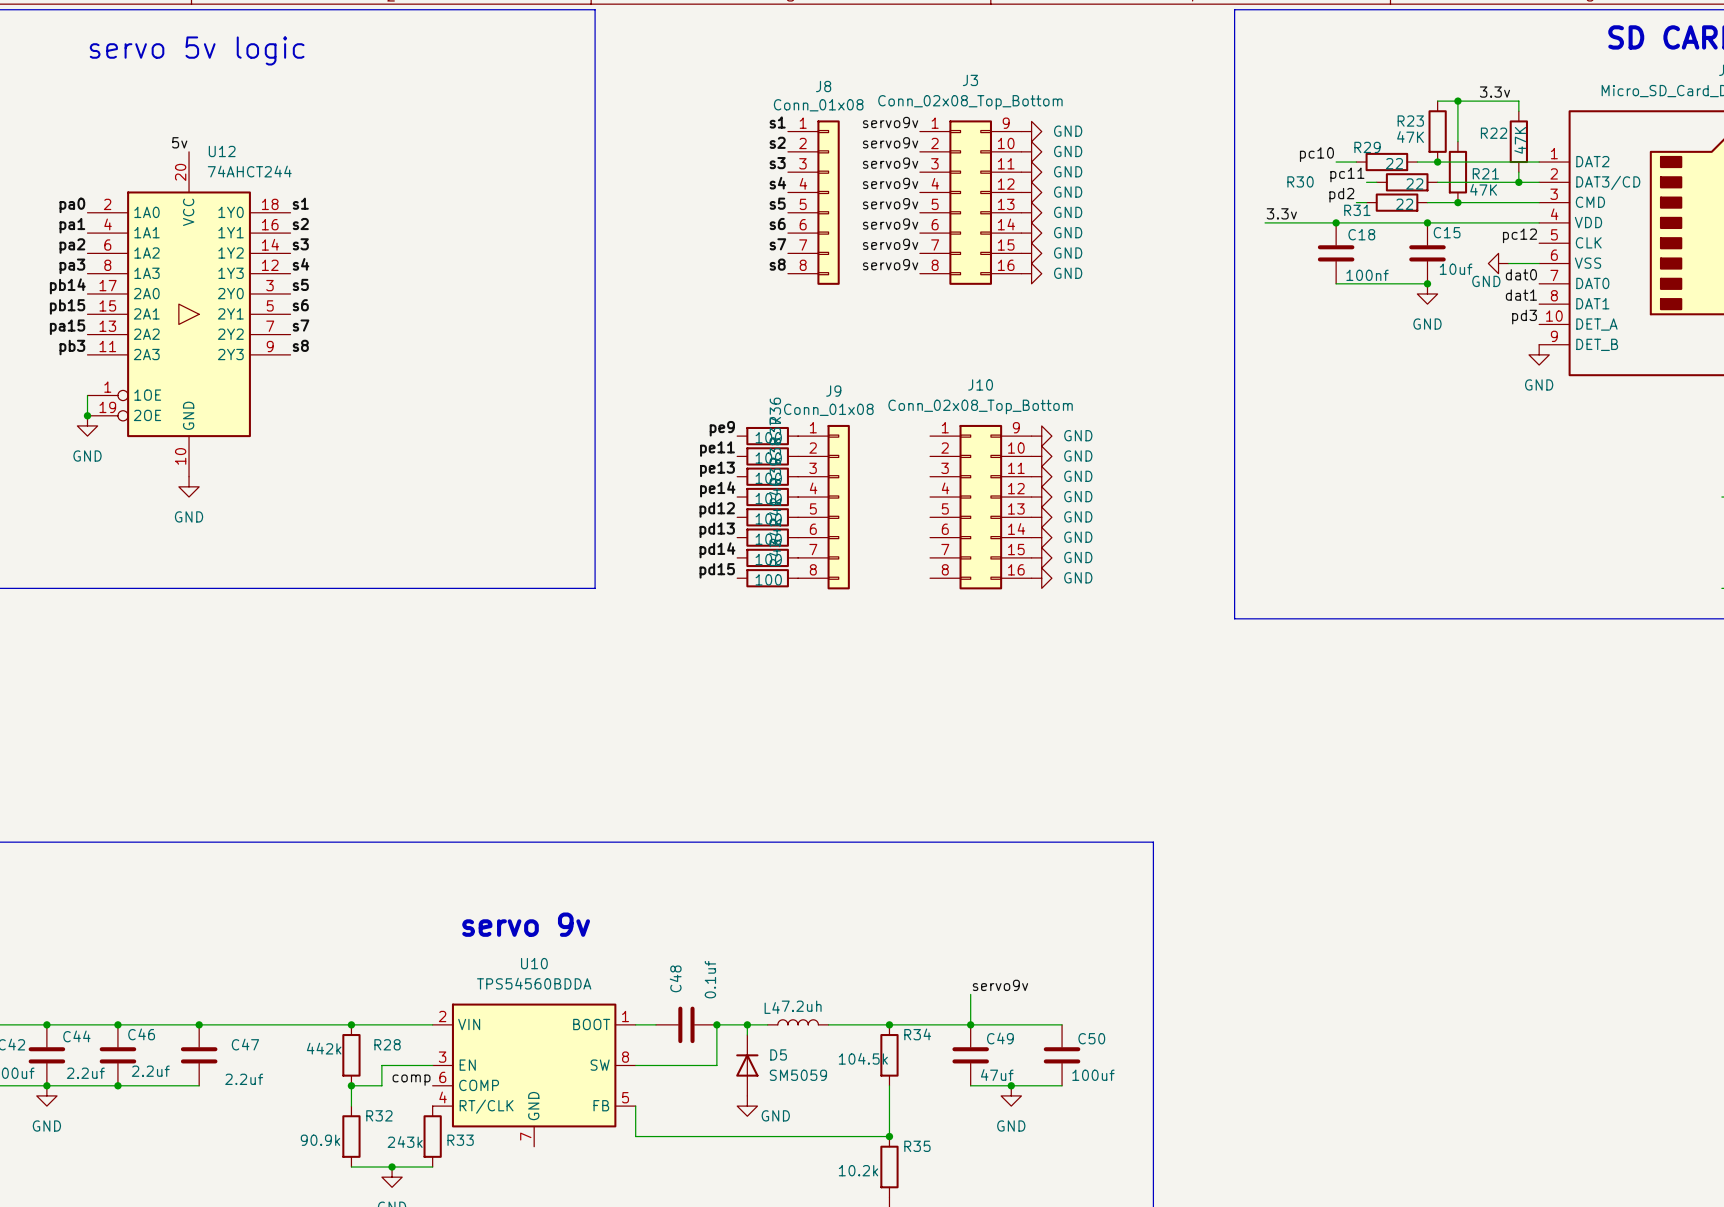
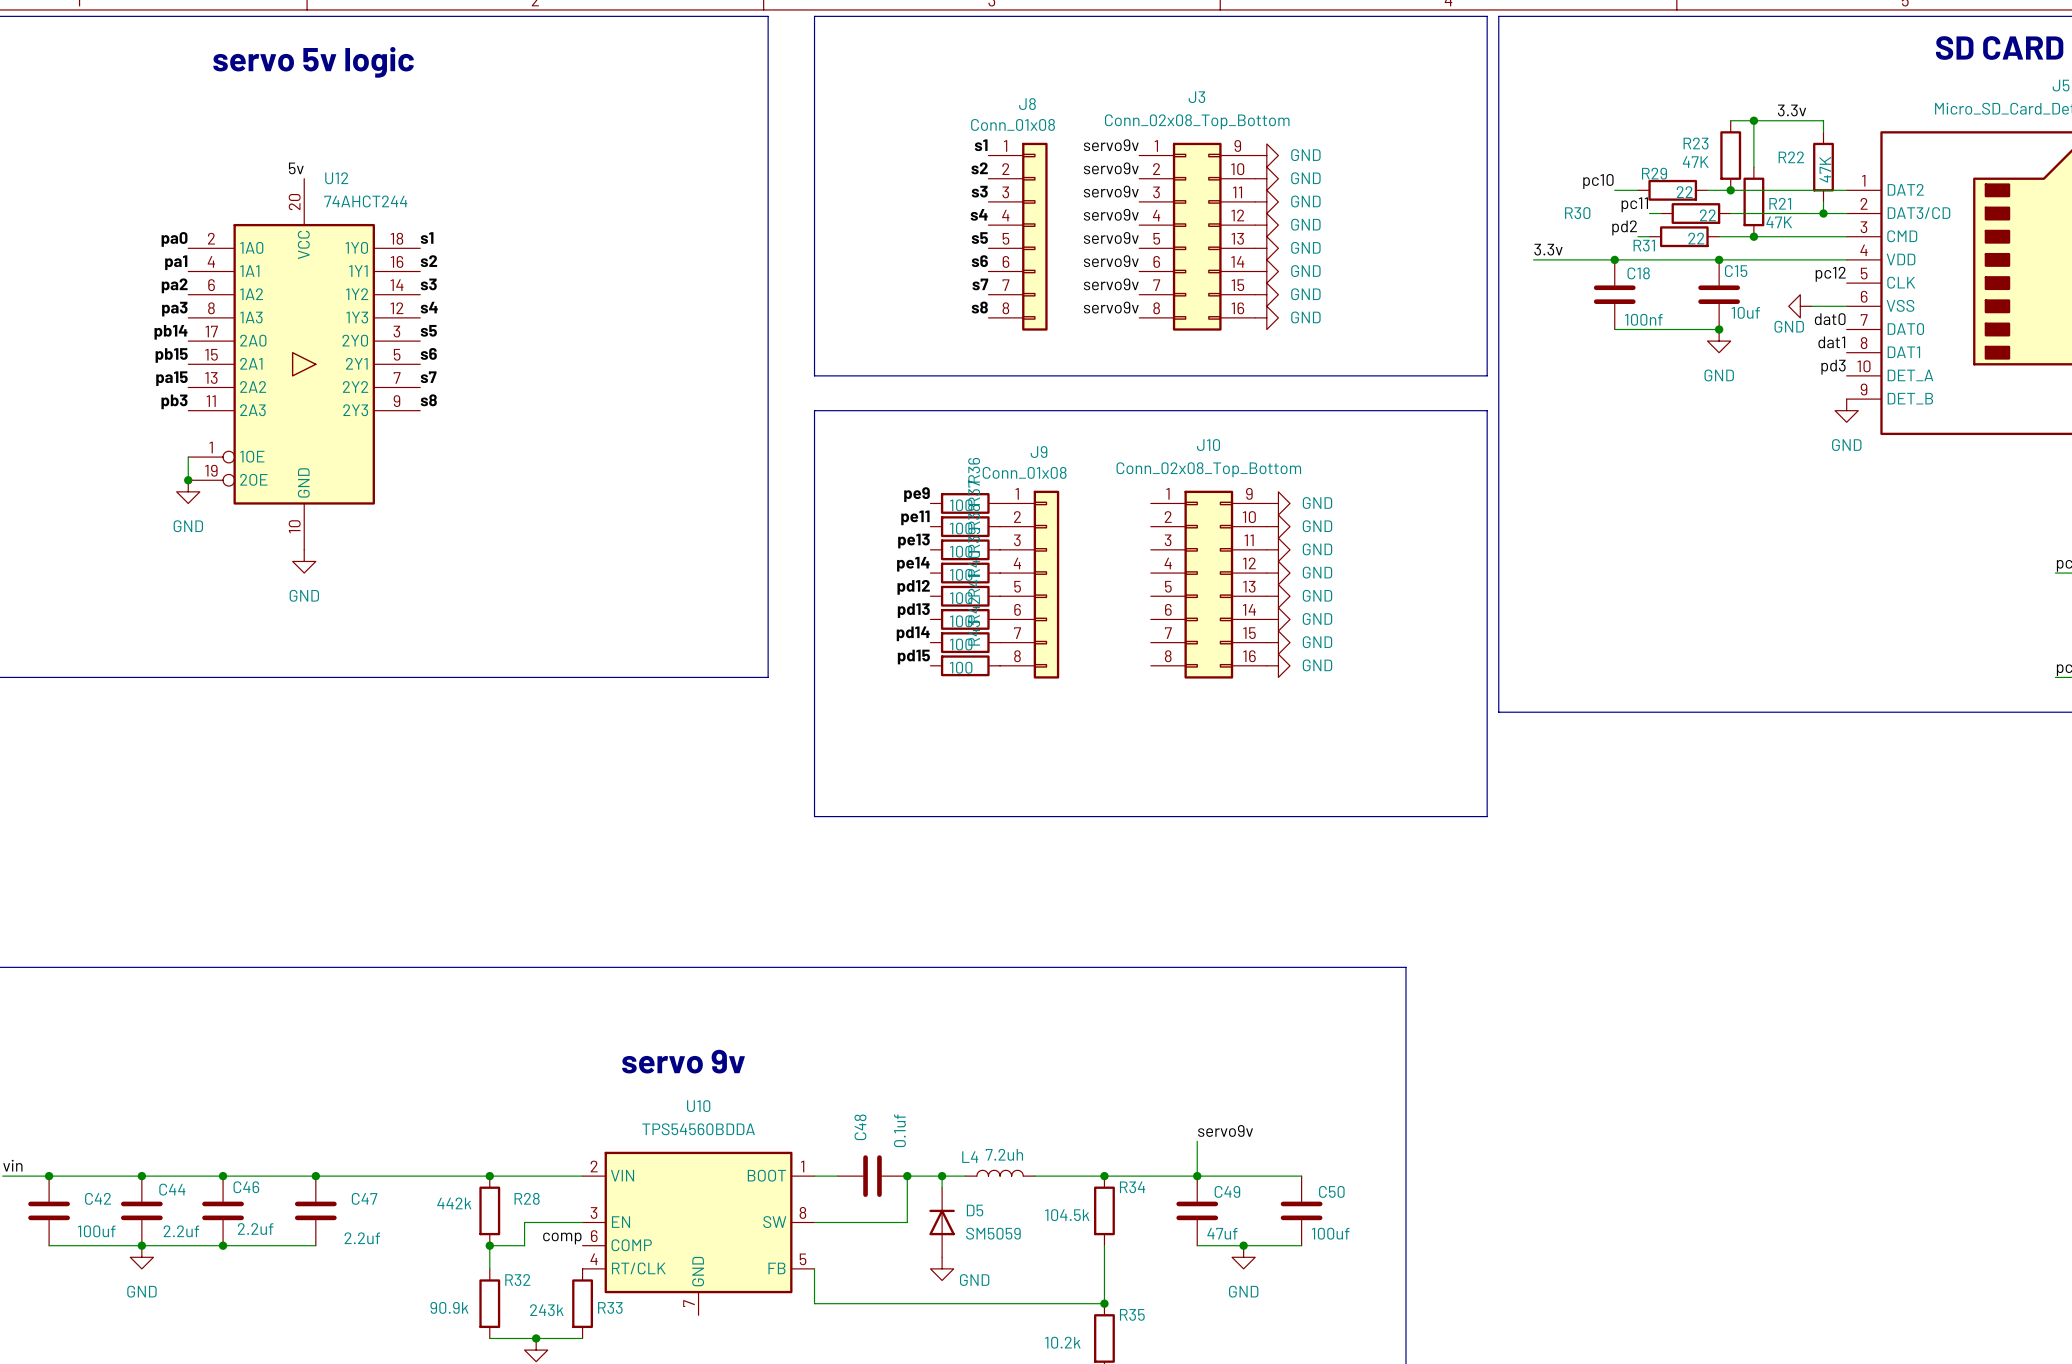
line: none -> (814, 16) (1487, 16) (1487, 375) (814, 375) (814, 16)
line: none -> (814, 410) (814, 816) (1487, 816) (1487, 410) (814, 410)

